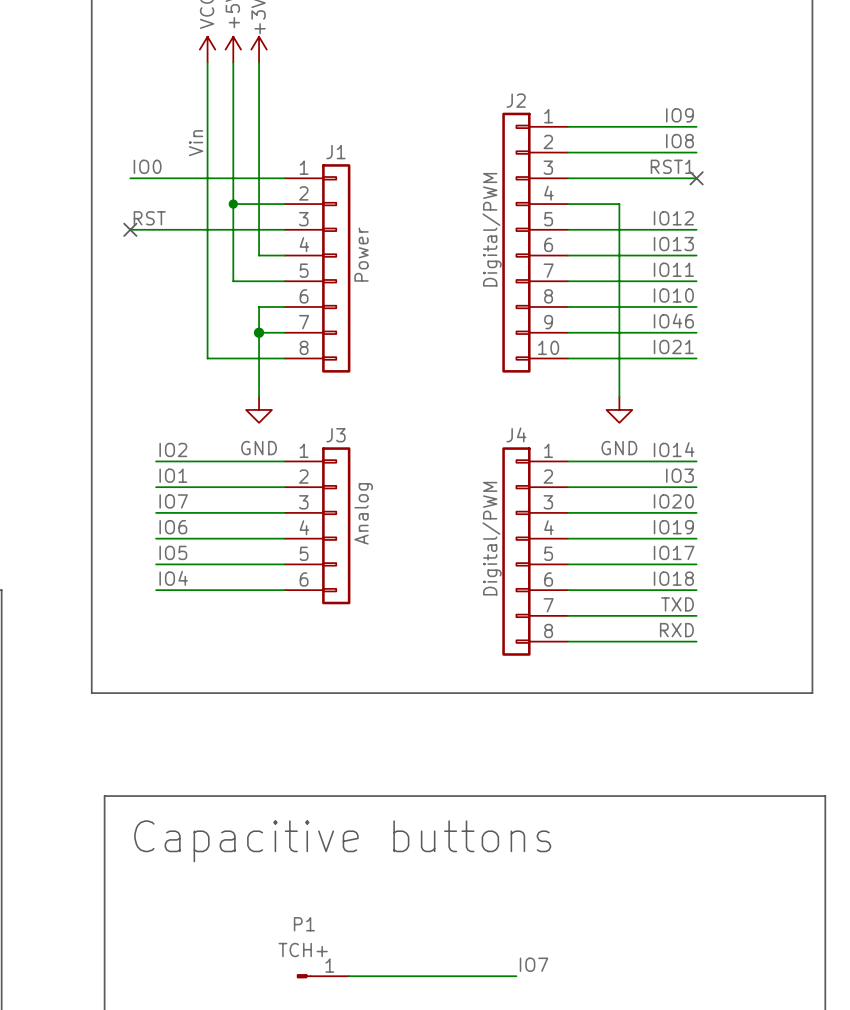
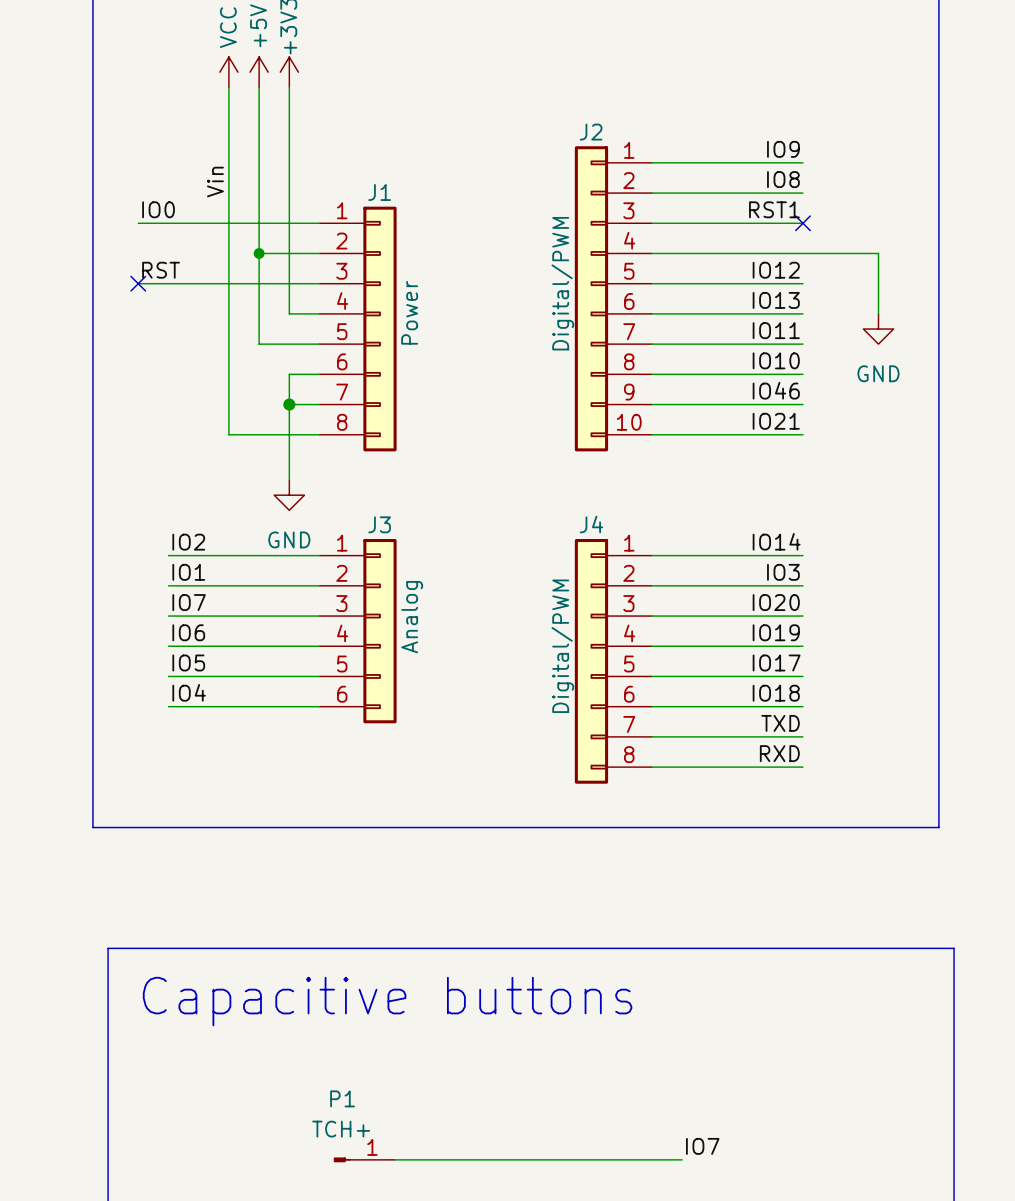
wire: (619, 204) (619, 397) -> (712, 253) (878, 253) (878, 313)
power symbol position: GND (619, 409) -> GND (878, 329)
label position: IO7 (534, 964) -> IO7 (702, 1146)
wire: none -> (591, 1159) (682, 1159)

